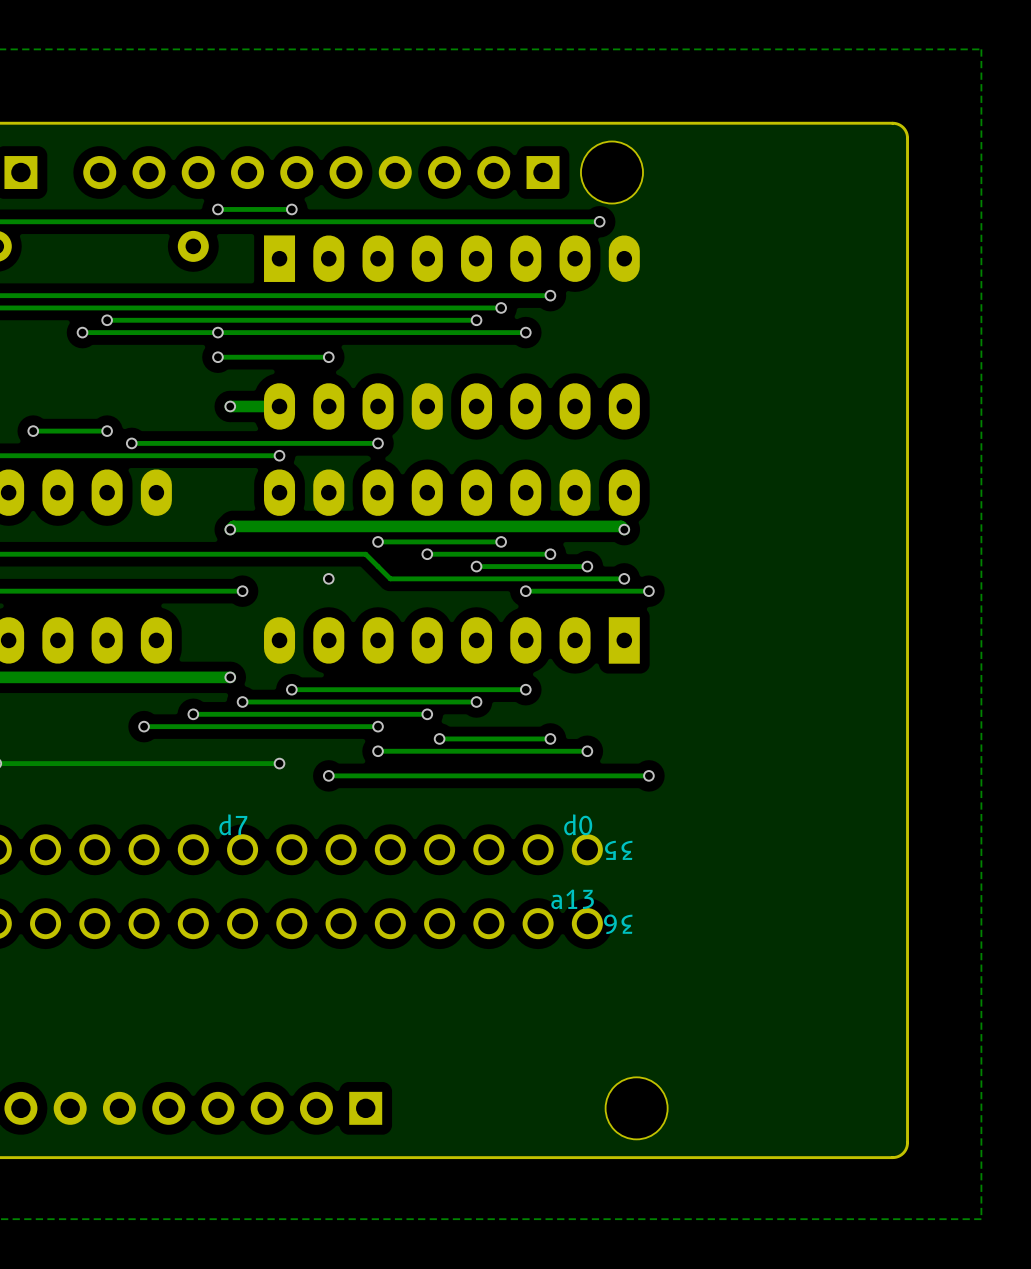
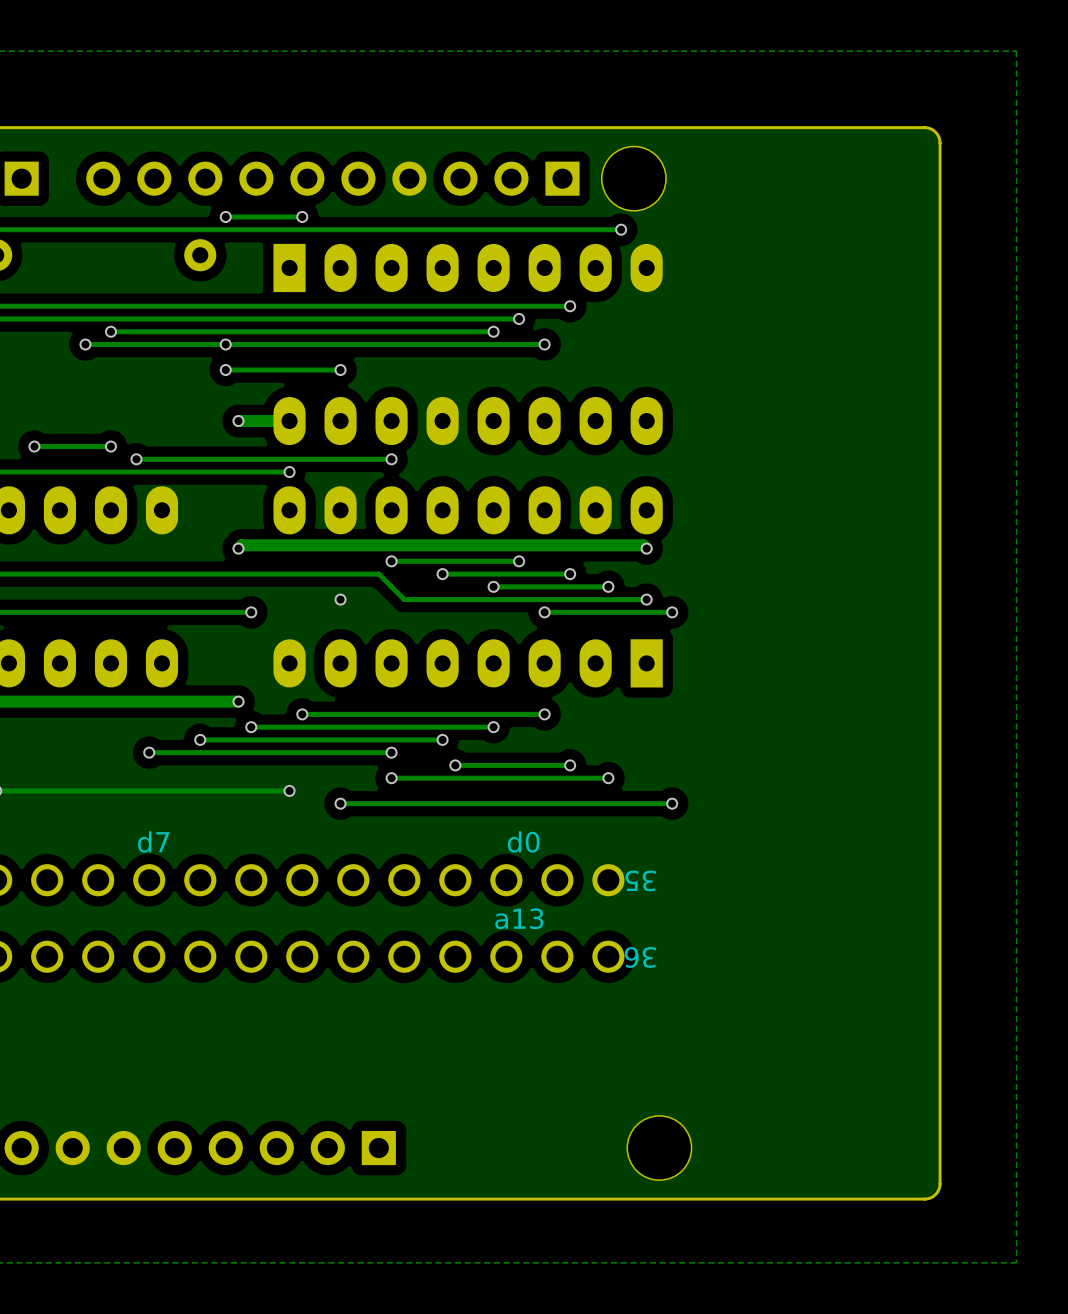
text position: d7 (233, 824) -> d7 (153, 841)
text position: d0 (578, 824) -> d0 (523, 841)
text position: a13 (572, 899) -> a13 (519, 918)

